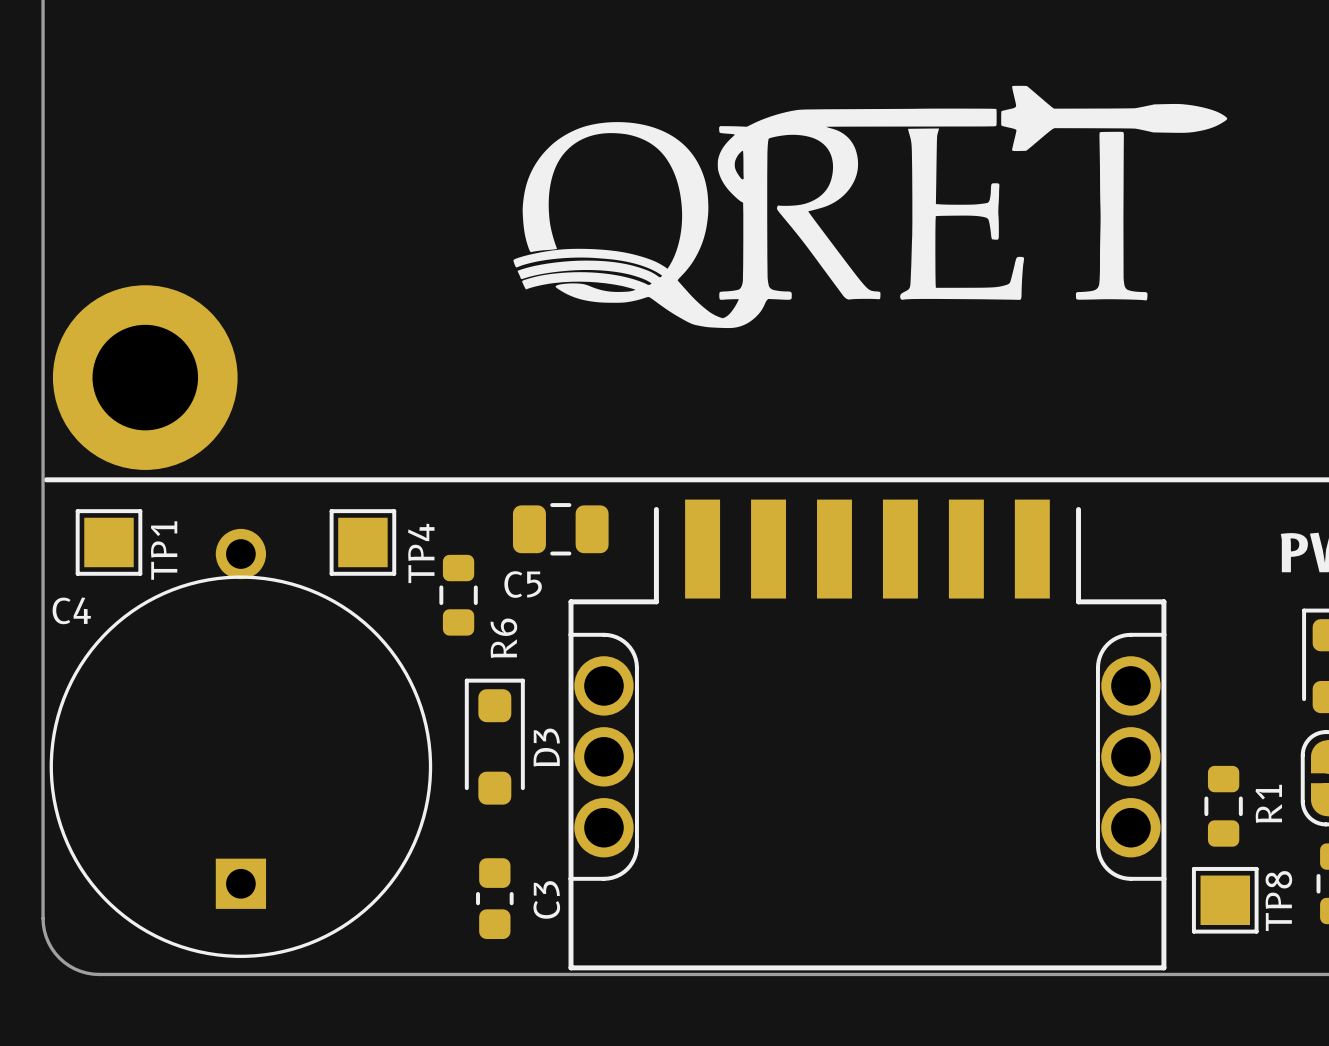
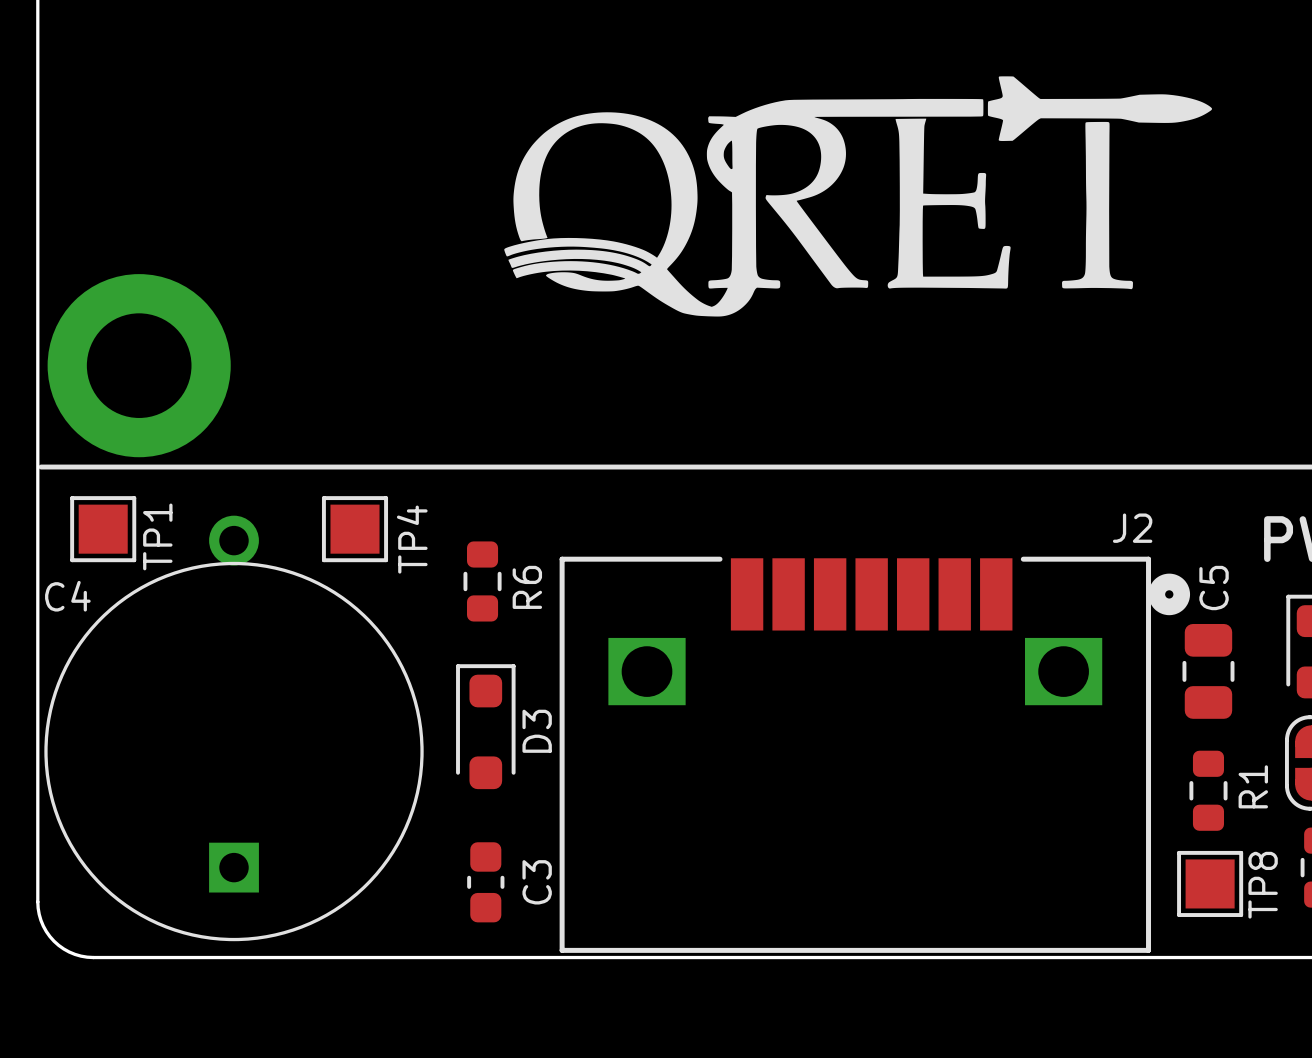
C5 rotation: 0° (560, 529) -> 90° clockwise (1208, 671)
C5 position: (560, 529) -> (1208, 671)
C5 name position: C5 (523, 584) -> C5 (1214, 588)
R6 position: (458, 595) -> (482, 581)
R6 name position: R6 (503, 638) -> R6 (527, 587)
part: (867, 734) -> none
J2: none -> (874, 754)

